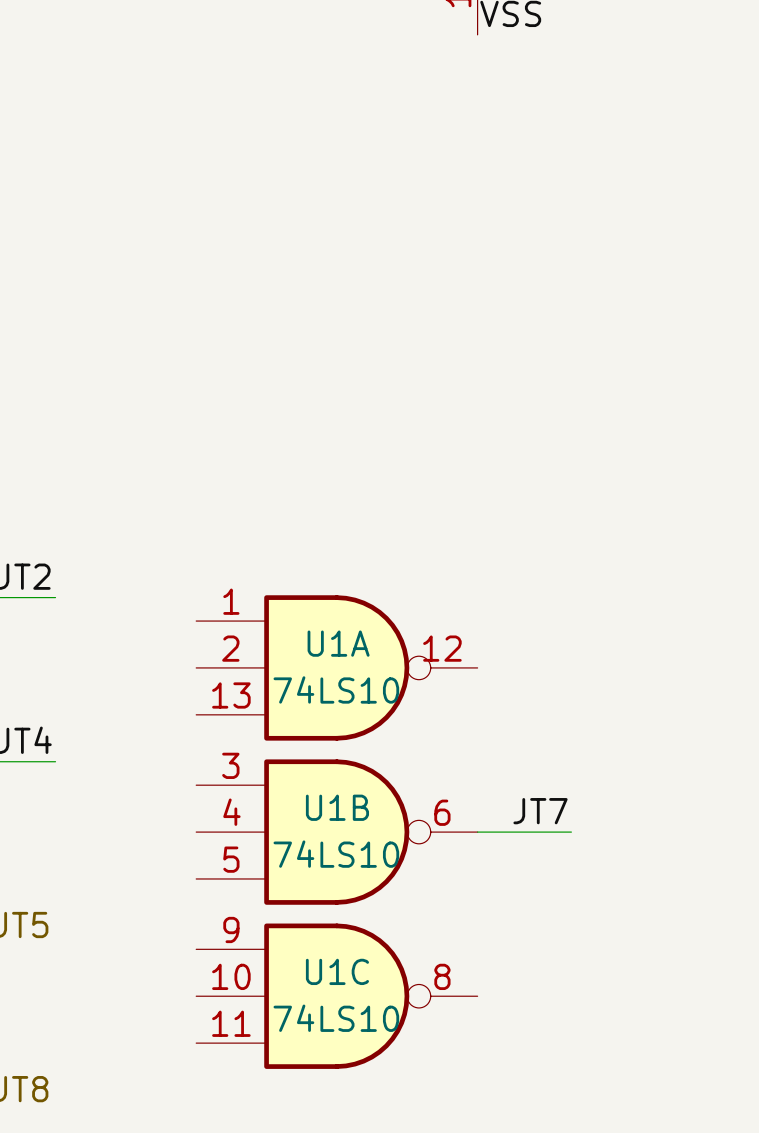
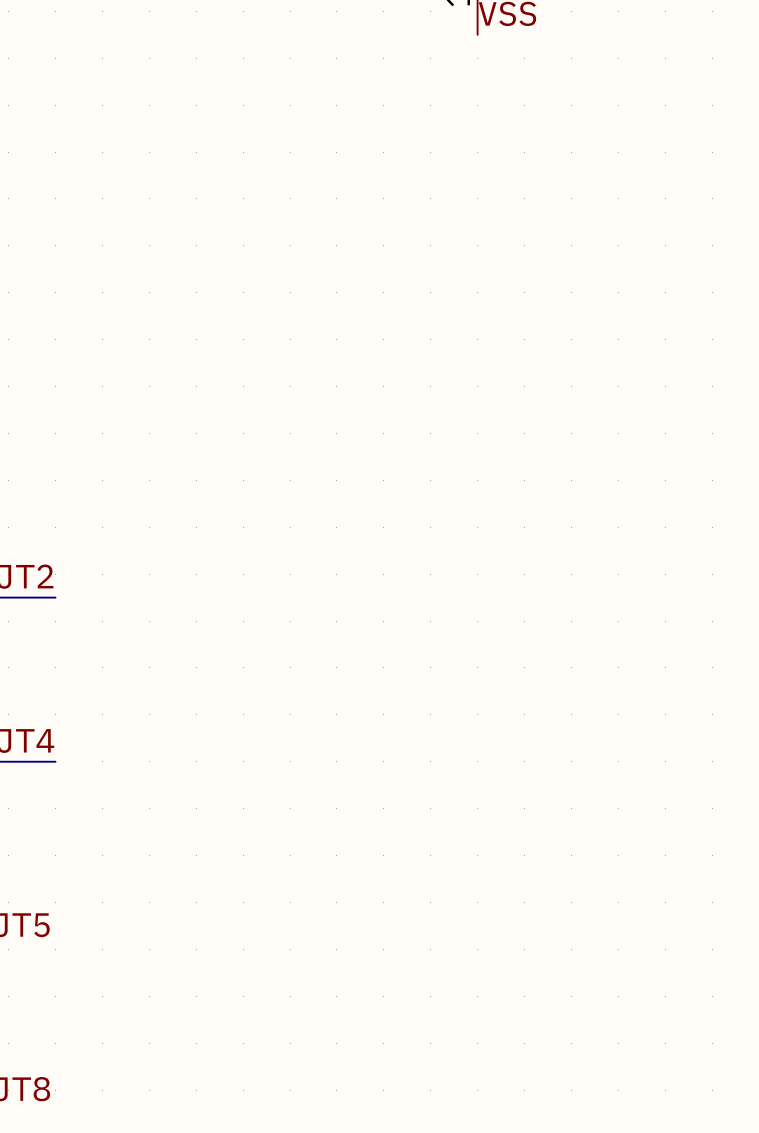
U1A: 74LS10 (336, 667) -> none
label: JT7 (540, 811) -> none
U1B: 74LS10 (336, 832) -> none
wire: (477, 832) (571, 832) -> none
U1C: 74LS10 (336, 996) -> none

